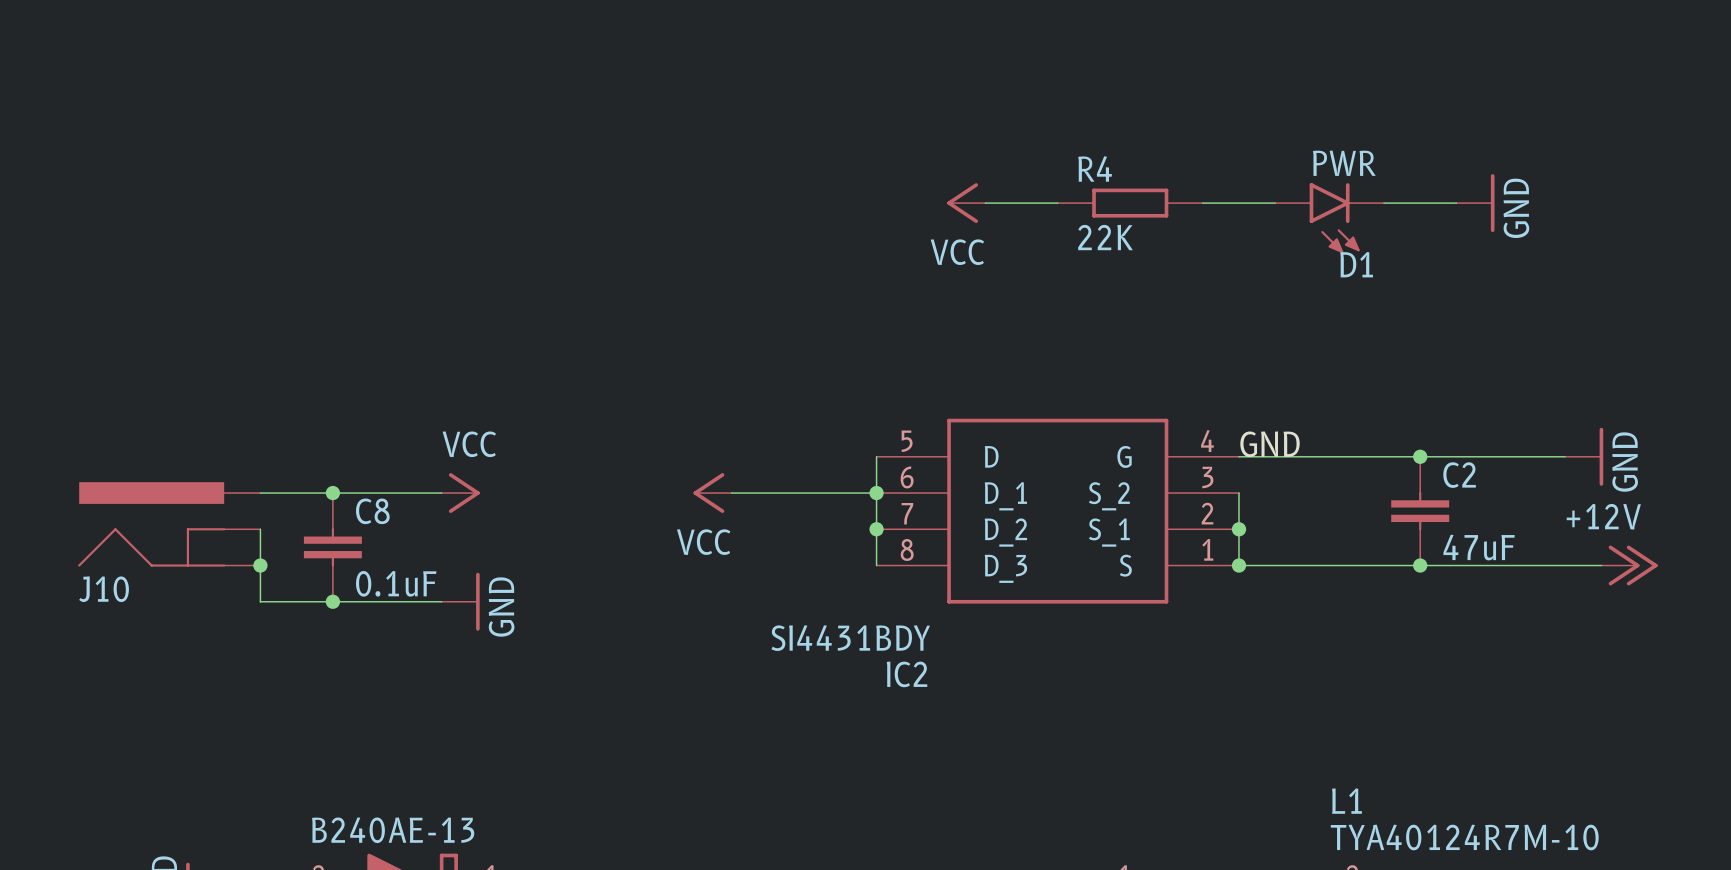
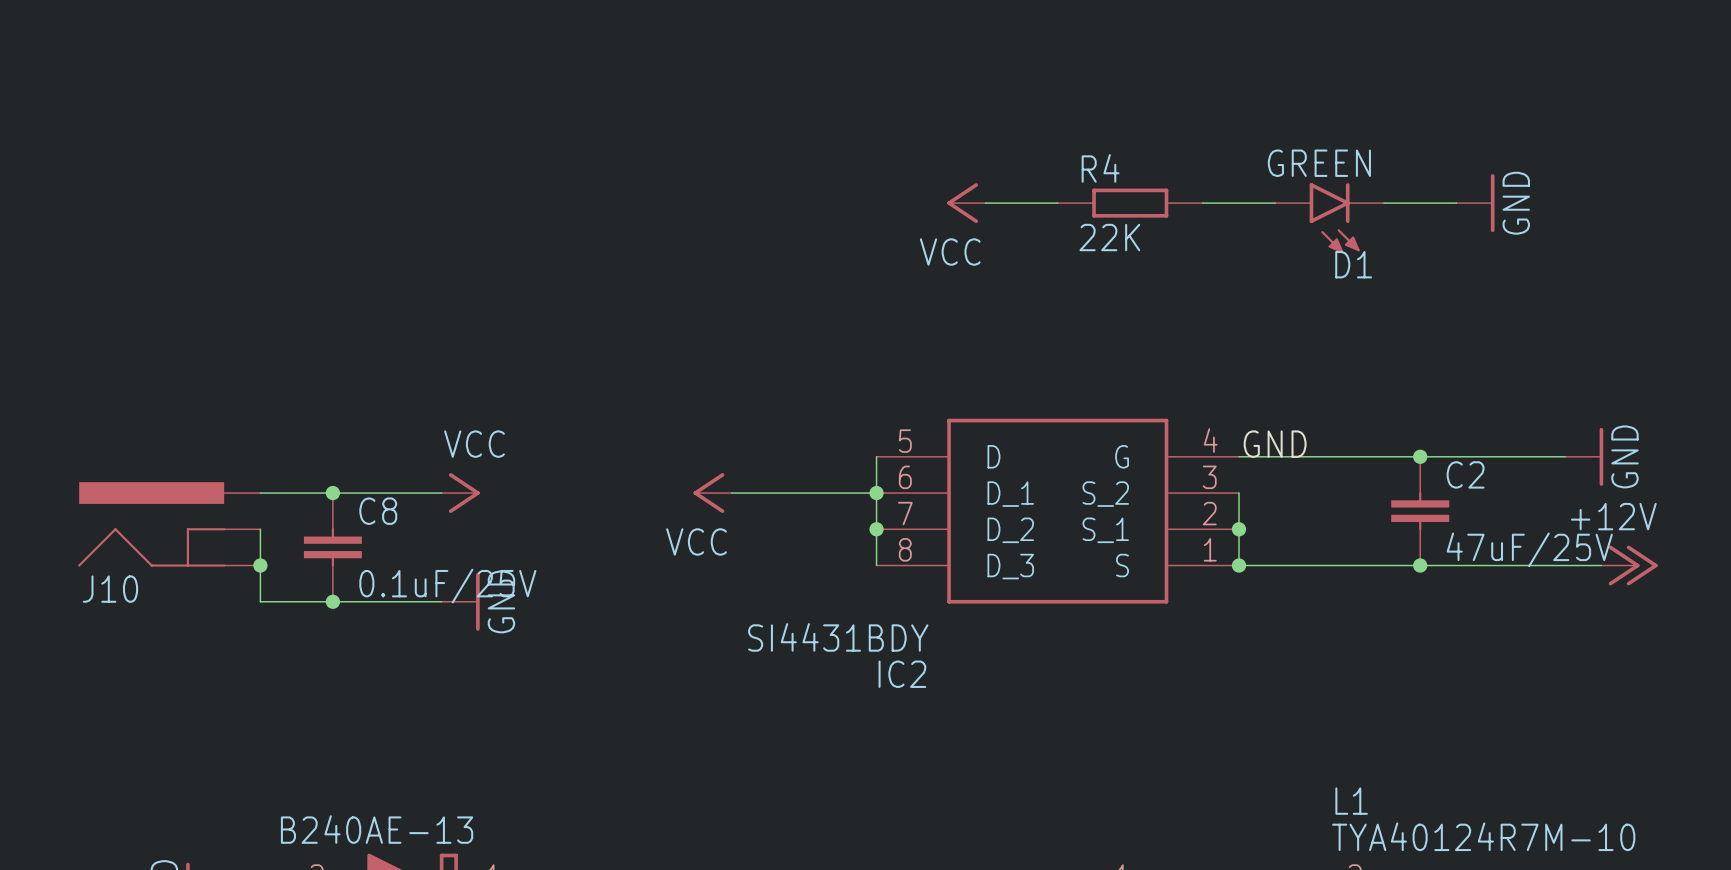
D1 value: PWR (1344, 163) -> GREEN (1319, 163)
C2 value: 47uF (1479, 547) -> 47uF/25V (1529, 549)
C8 value: 0.1uF (396, 583) -> 0.1uF/25V (447, 586)

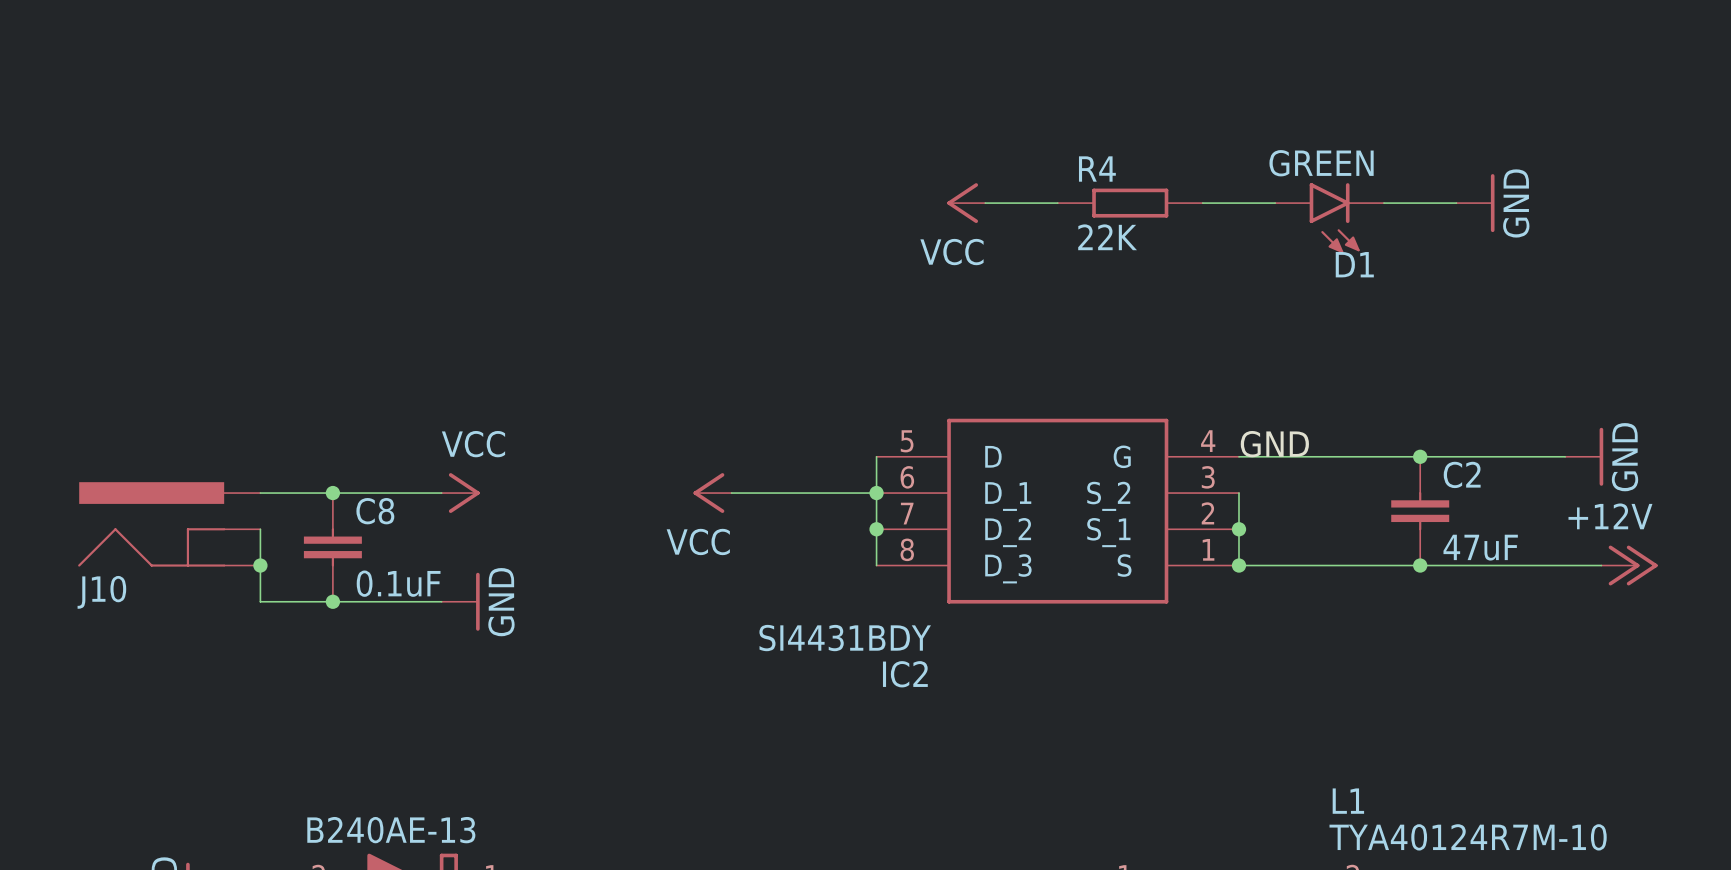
C2 value: 47uF/25V (1529, 549) -> 47uF (1480, 547)
C8 value: 0.1uF/25V (447, 586) -> 0.1uF (398, 583)

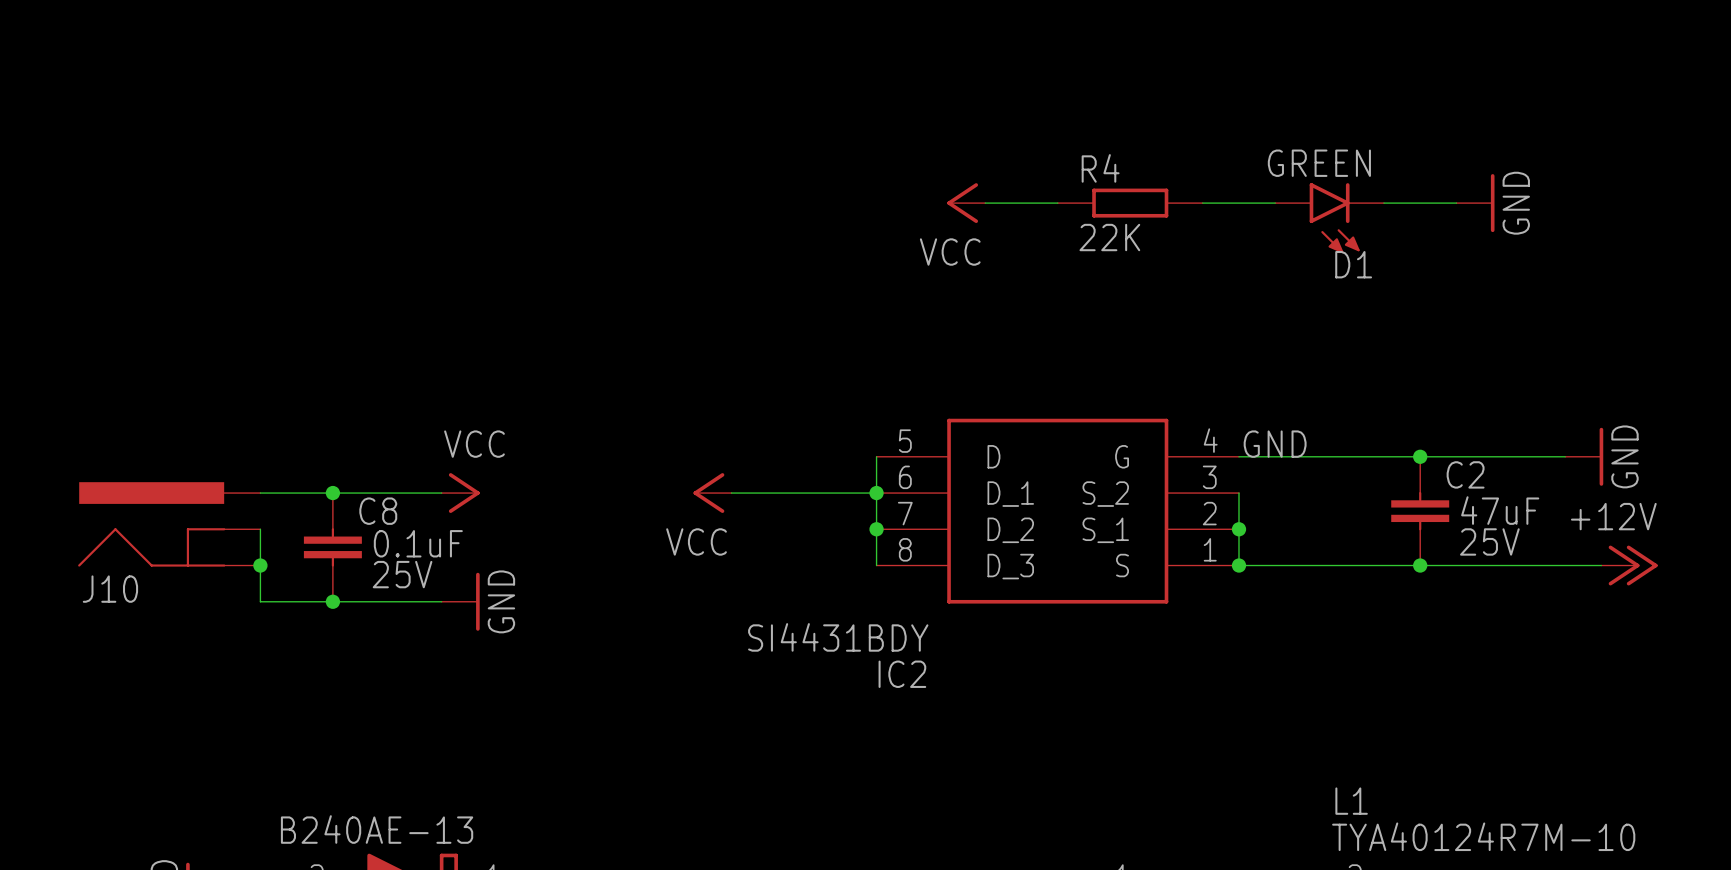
C2 text: none -> 25V (1489, 541)
C2 value position: 47uF (1480, 547) -> 47uF (1500, 510)
C8 text: none -> 25V (402, 574)
C8 value position: 0.1uF (398, 583) -> 0.1uF (418, 543)

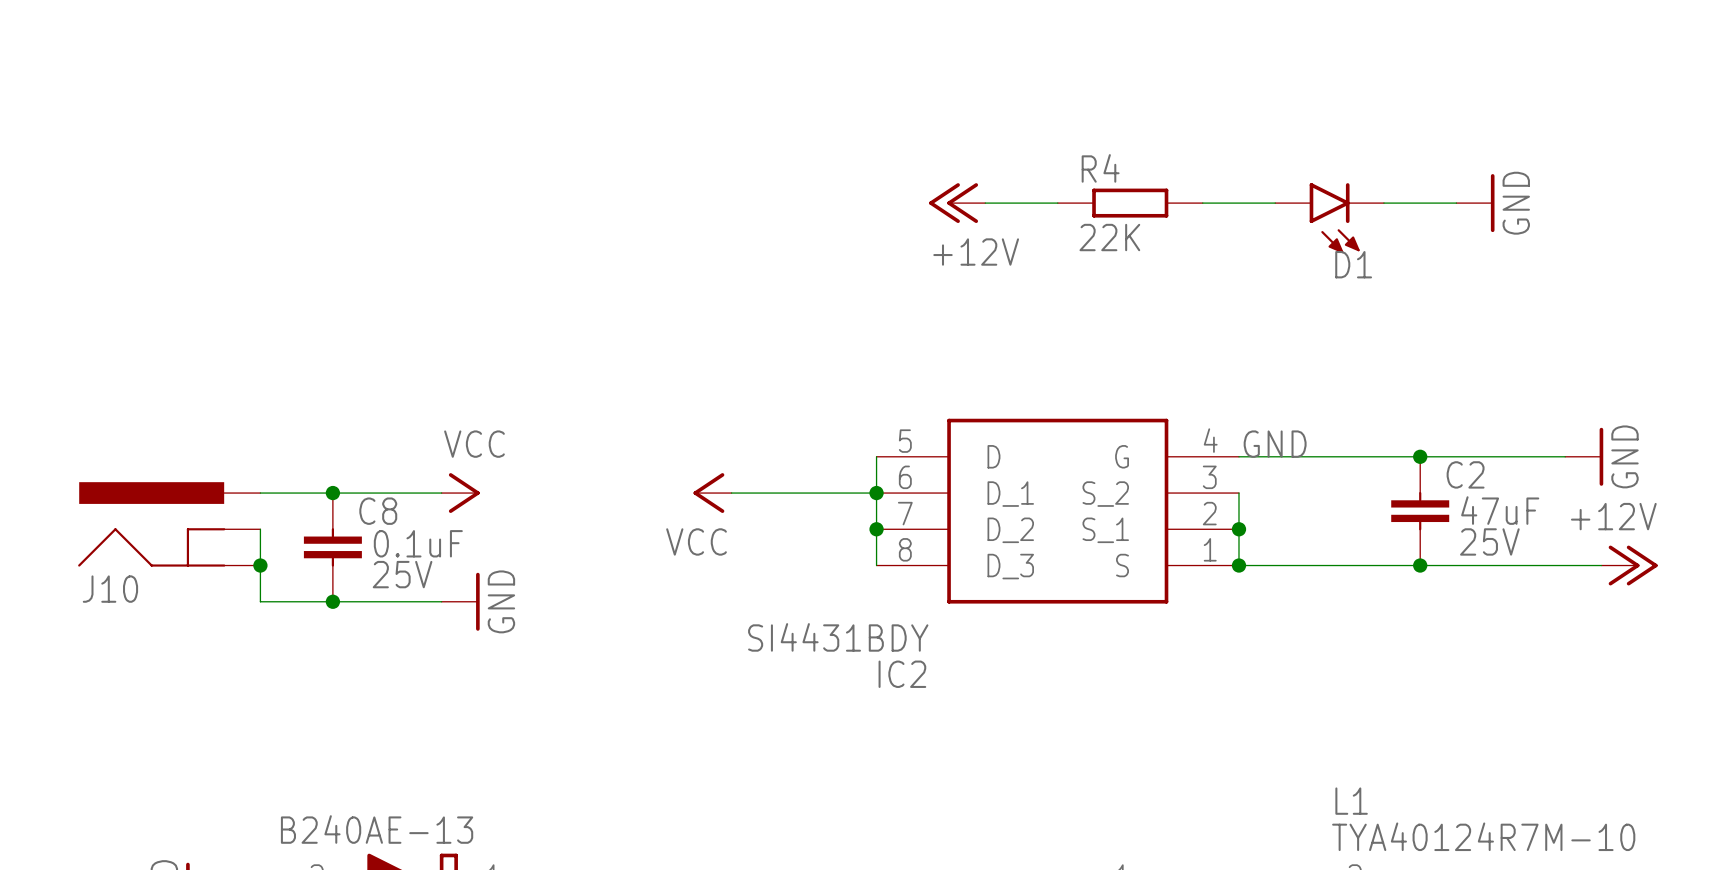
D1 value: GREEN (1319, 163) -> none
power symbol: VCC (966, 203) -> +12V (957, 203)

